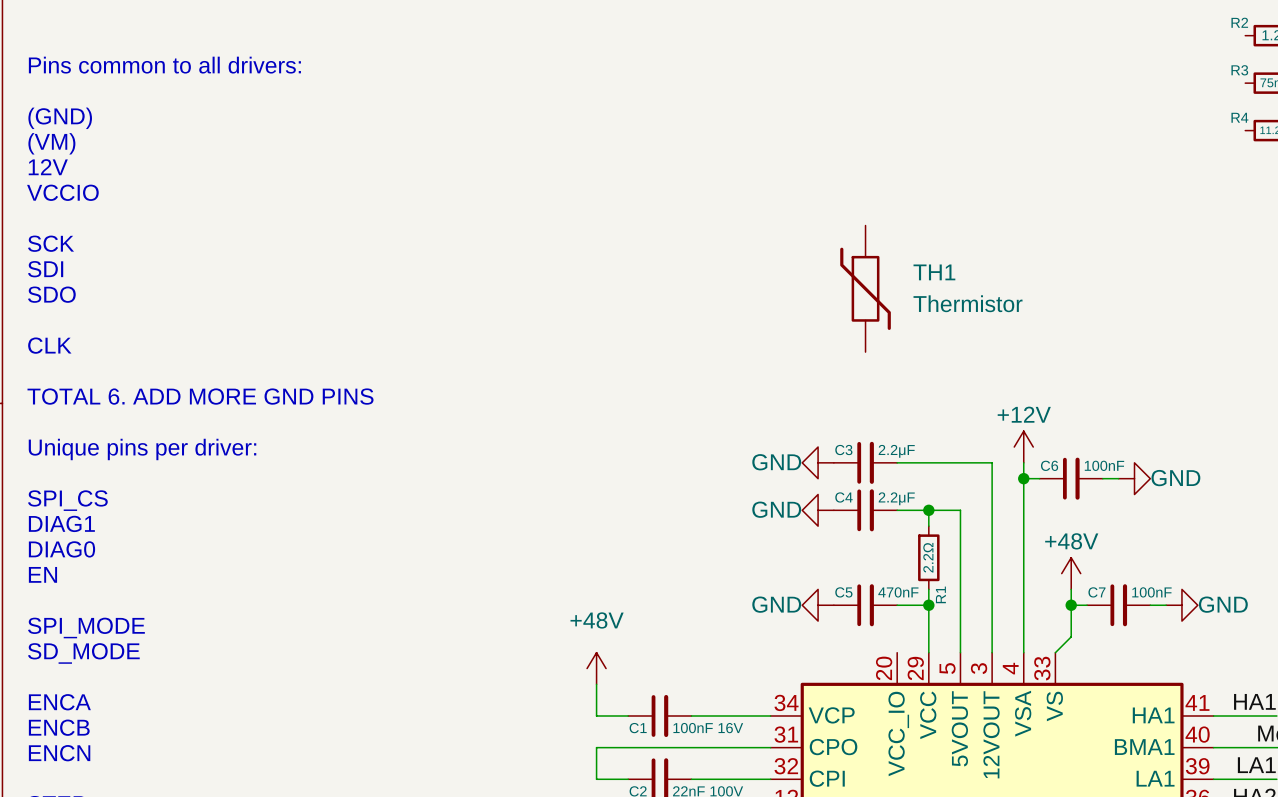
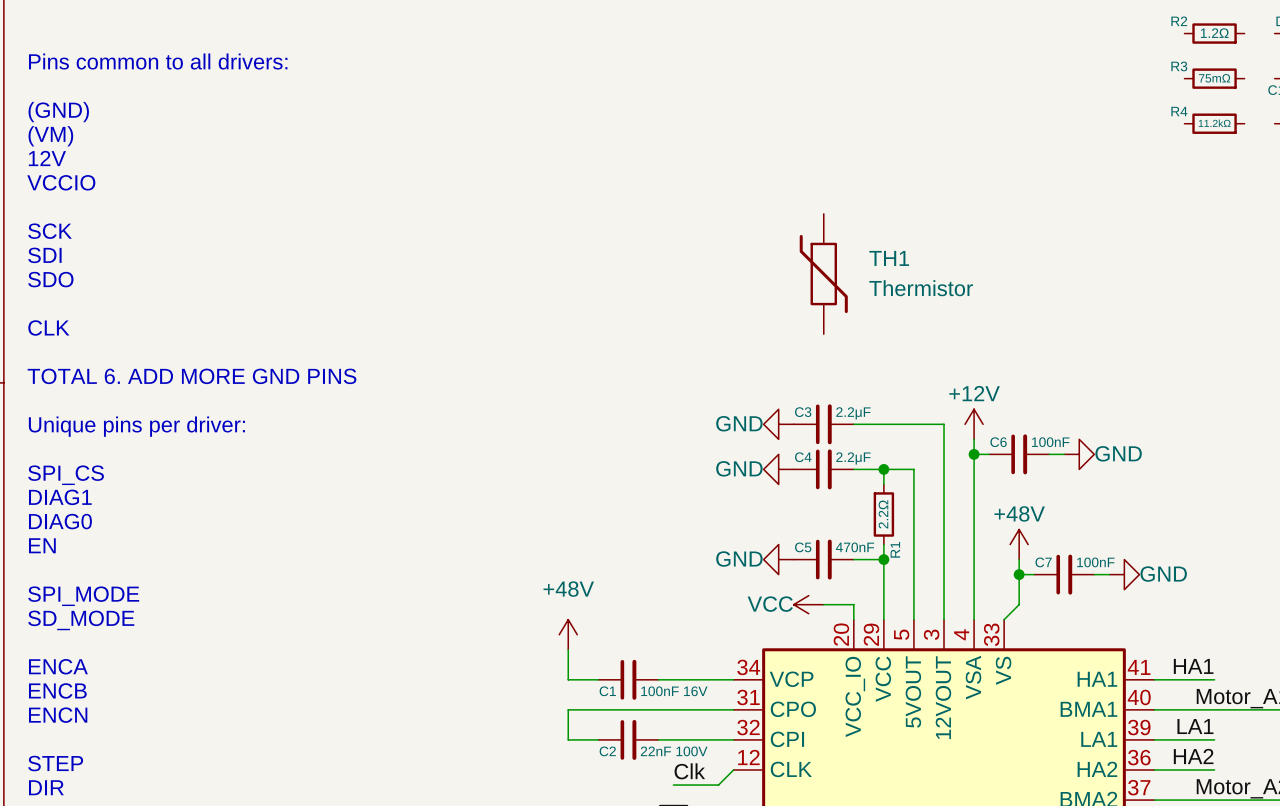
power symbol: none -> GND (778, 424)
power symbol: GND (818, 462) -> none
C3 position: (865, 462) -> (823, 424)
wire: (897, 462) (992, 462) -> (853, 424) (944, 424) (944, 439)
power symbol: none -> GND (778, 469)
power symbol: GND (818, 510) -> none
C4 position: (865, 510) -> (823, 469)
wire: (897, 510) (960, 510) -> (853, 469) (913, 469) (913, 484)
junction position: (928, 510) -> (883, 469)
R1 position: (928, 557) -> (883, 514)
wire: none -> (883, 544) (883, 559) (853, 559)
power symbol position: GND (818, 605) -> GND (778, 559)
C5 position: (865, 605) -> (823, 559)
wire: (897, 605) (928, 605) -> none
junction position: (928, 605) -> (883, 559)
power symbol: none -> VCC (808, 604)
wire: none -> (823, 604) (853, 604) (853, 619)

